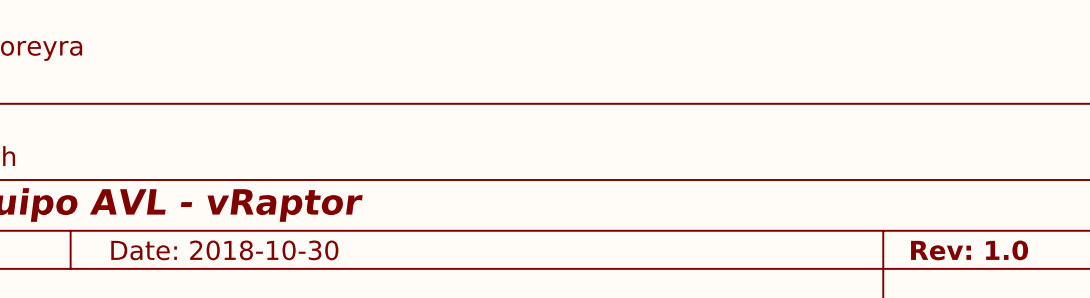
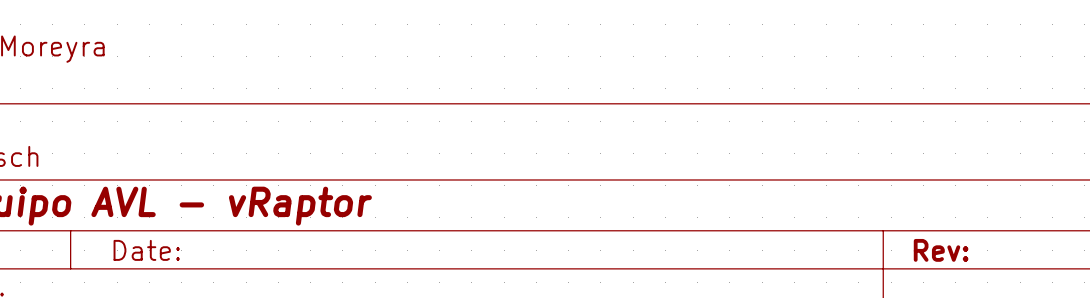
title block: Date: 2018-10-30 (224, 250) -> Date: (146, 250)
title block: Rev: 1.0 (969, 250) -> Rev: (941, 250)

